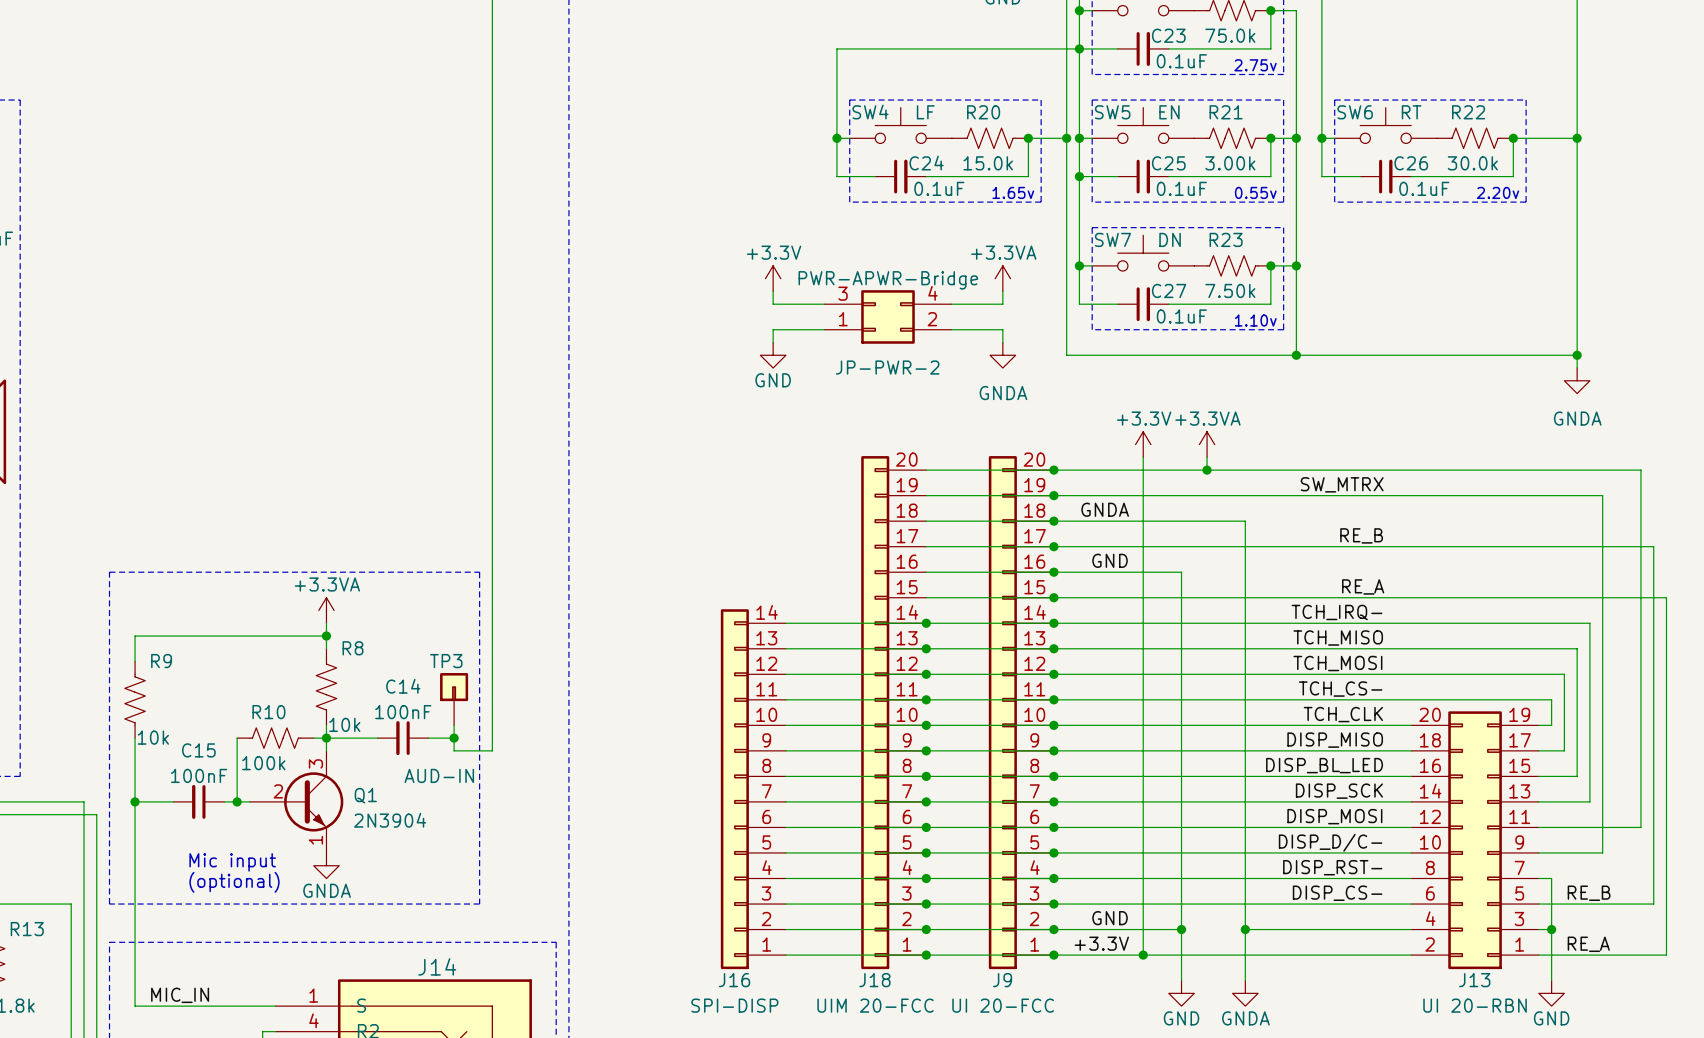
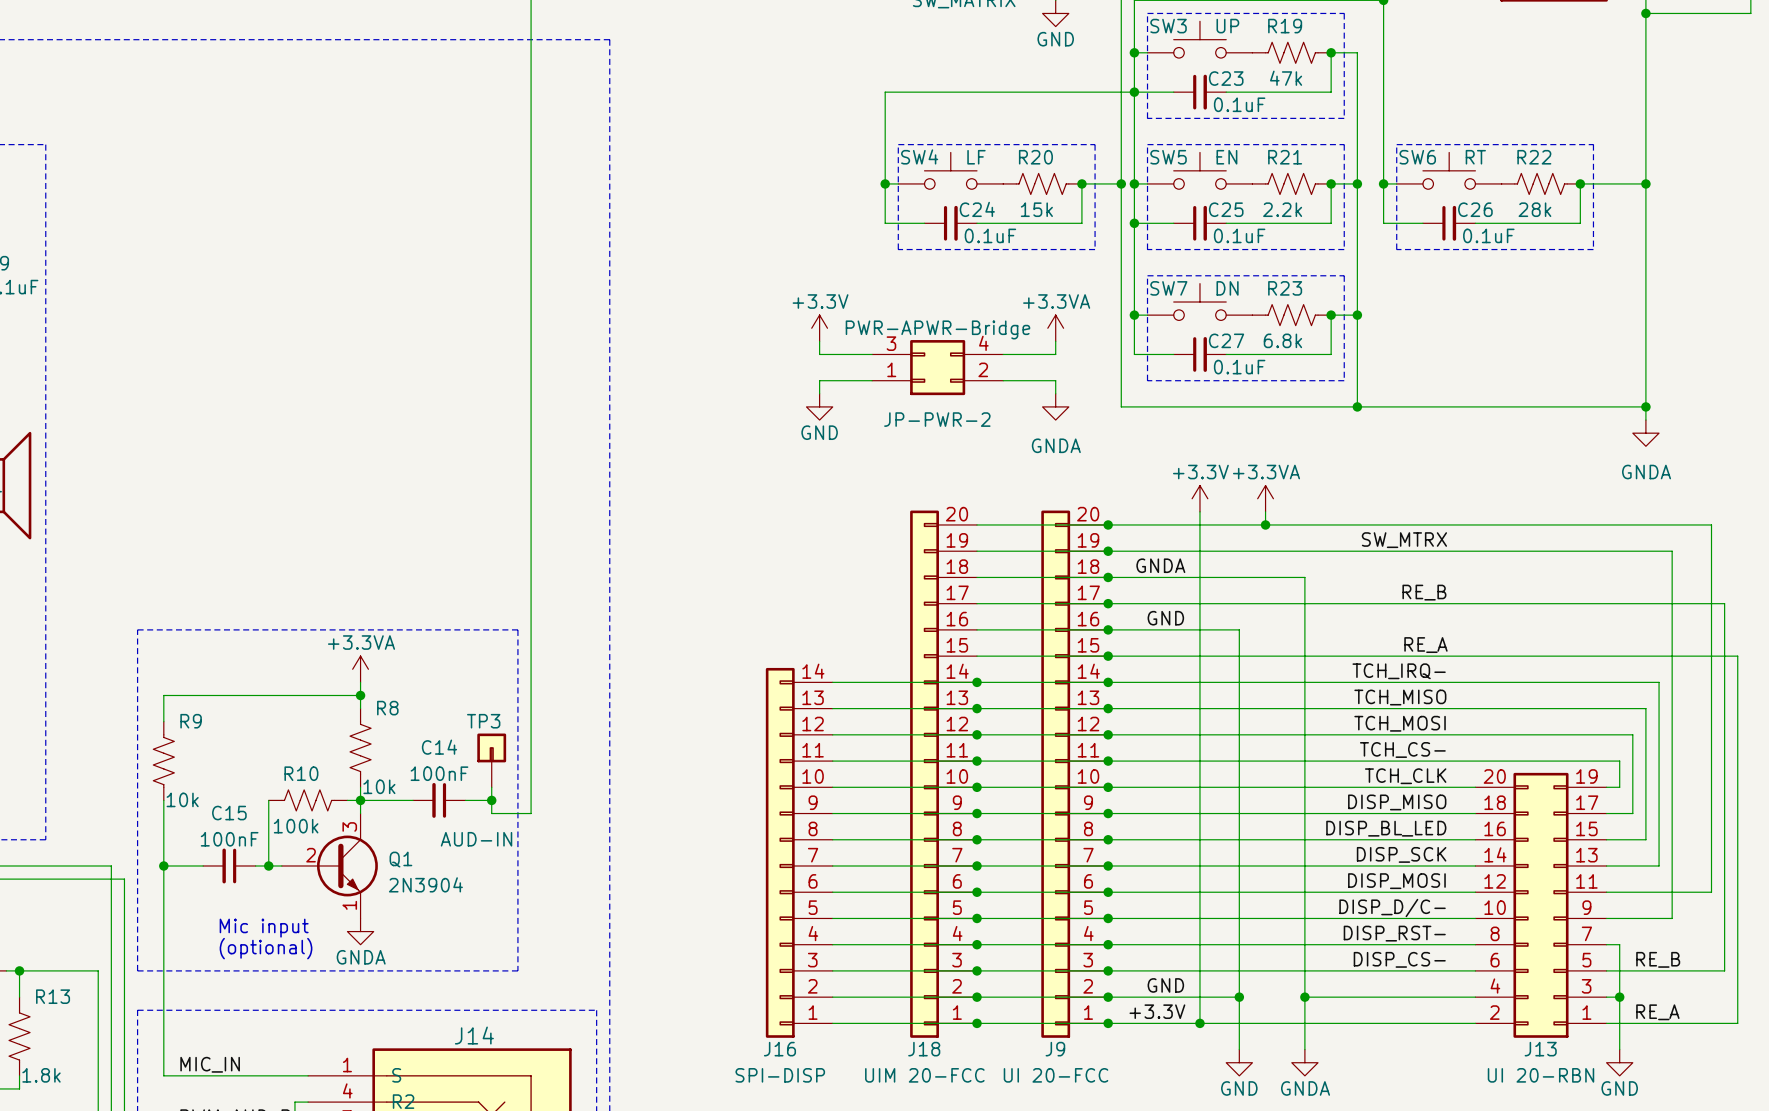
R19 value: 75.0k (1230, 35) -> 47k (1286, 78)
text: 2.75v (1255, 65) -> none
R20 value: 15.0k (988, 163) -> 15k (1036, 209)
R21 value: 3.00k (1230, 163) -> 2.2k (1282, 209)
R22 value: 30.0k (1472, 163) -> 28k (1534, 209)
text: 1.65v (1013, 192) -> none
text: 0.55v (1255, 192) -> none
text: 2.20v (1498, 192) -> none
R23 value: 7.50k (1230, 290) -> 6.8k (1282, 340)
text: 1.10v (1255, 320) -> none

